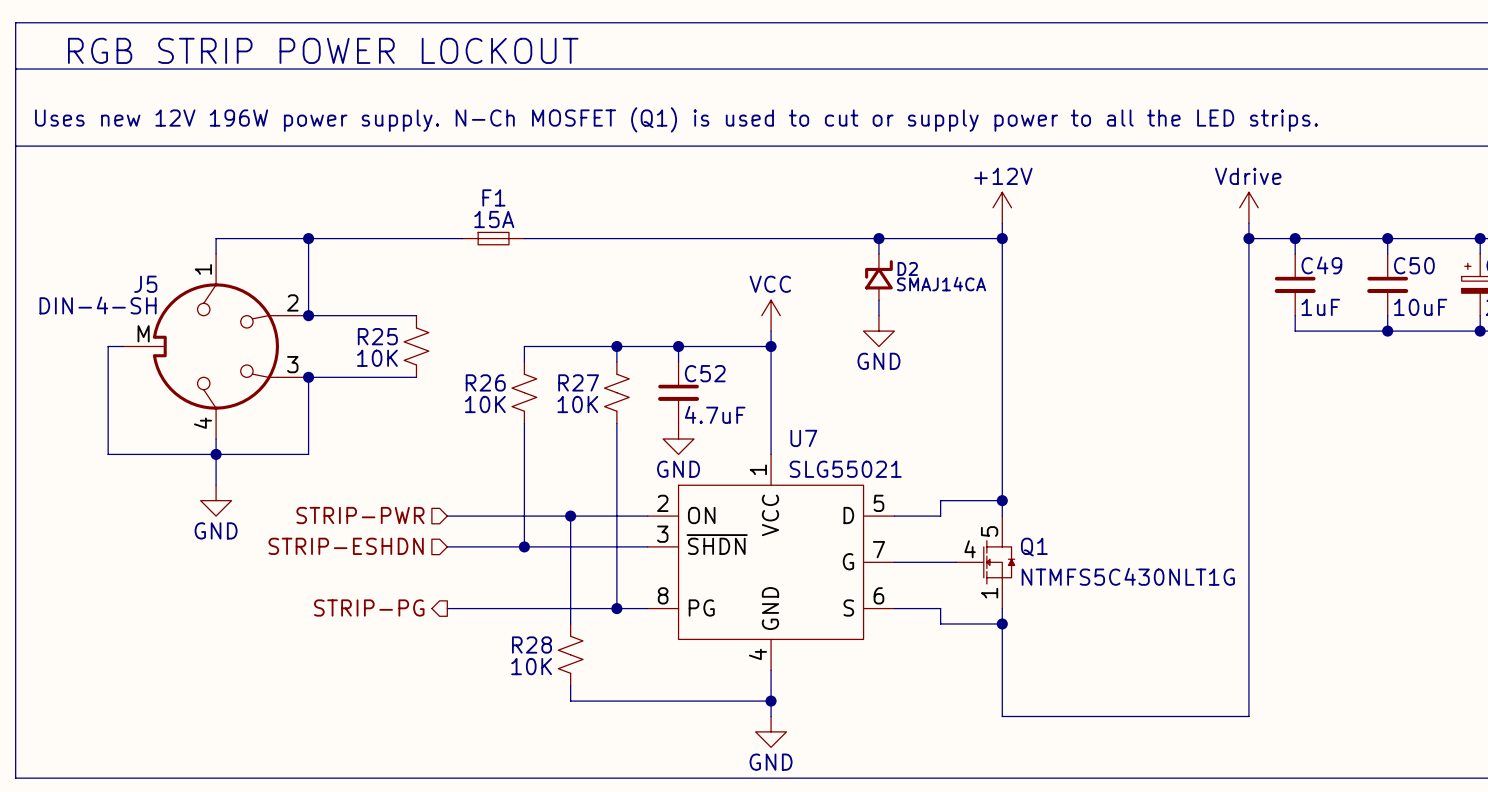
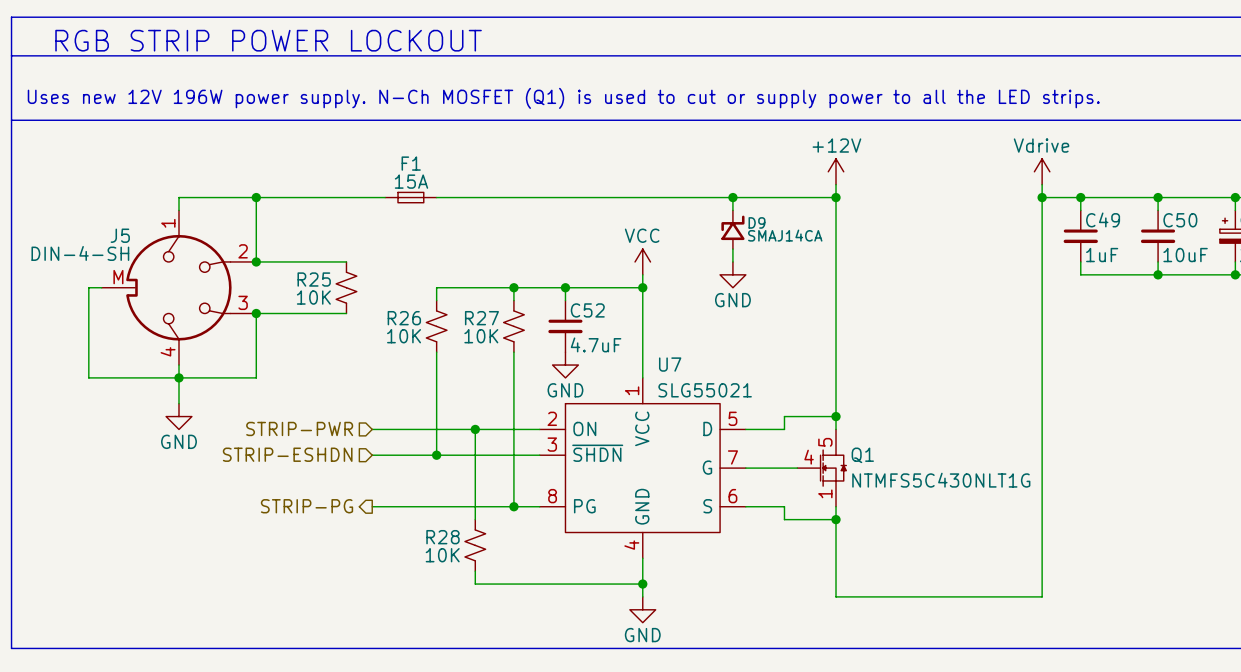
D2 name: D2 (907, 268) -> D9 (756, 222)

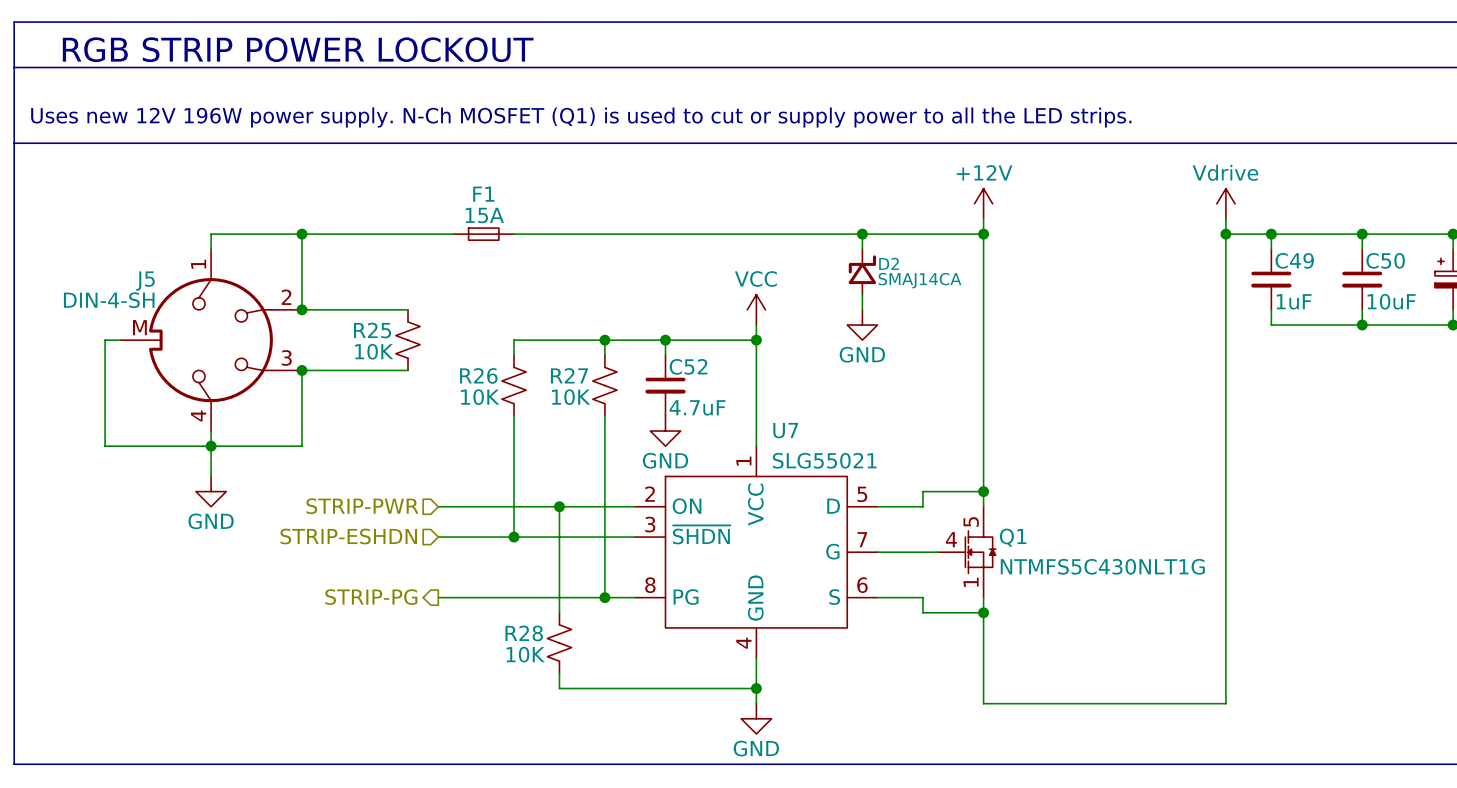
D9 name: D9 (756, 222) -> D2 (889, 263)

